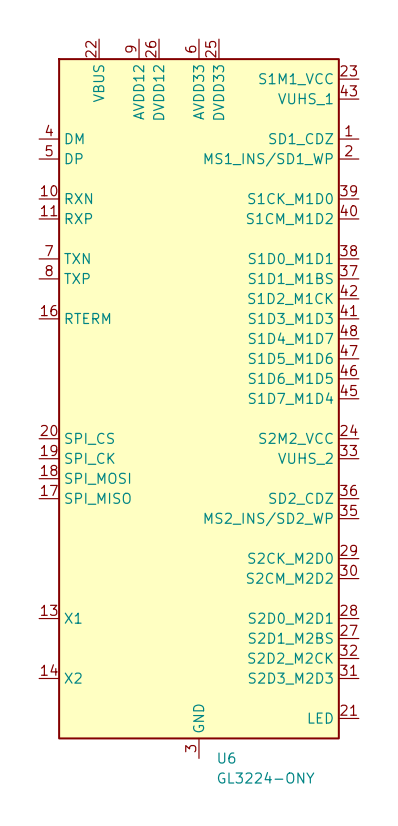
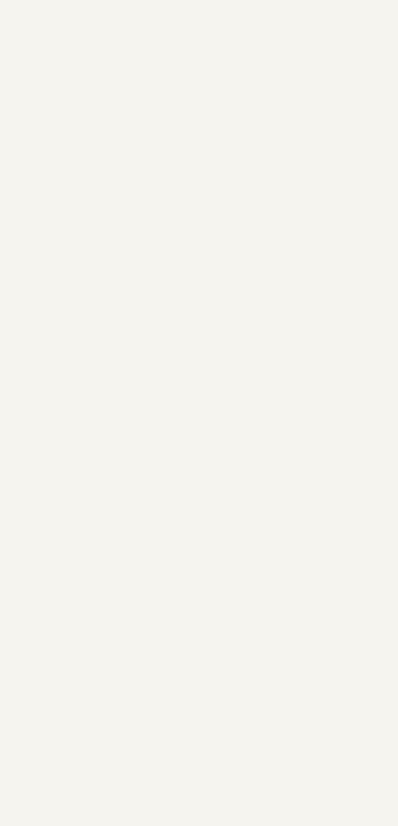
U6: GL3224-ONY (198, 398) -> none

